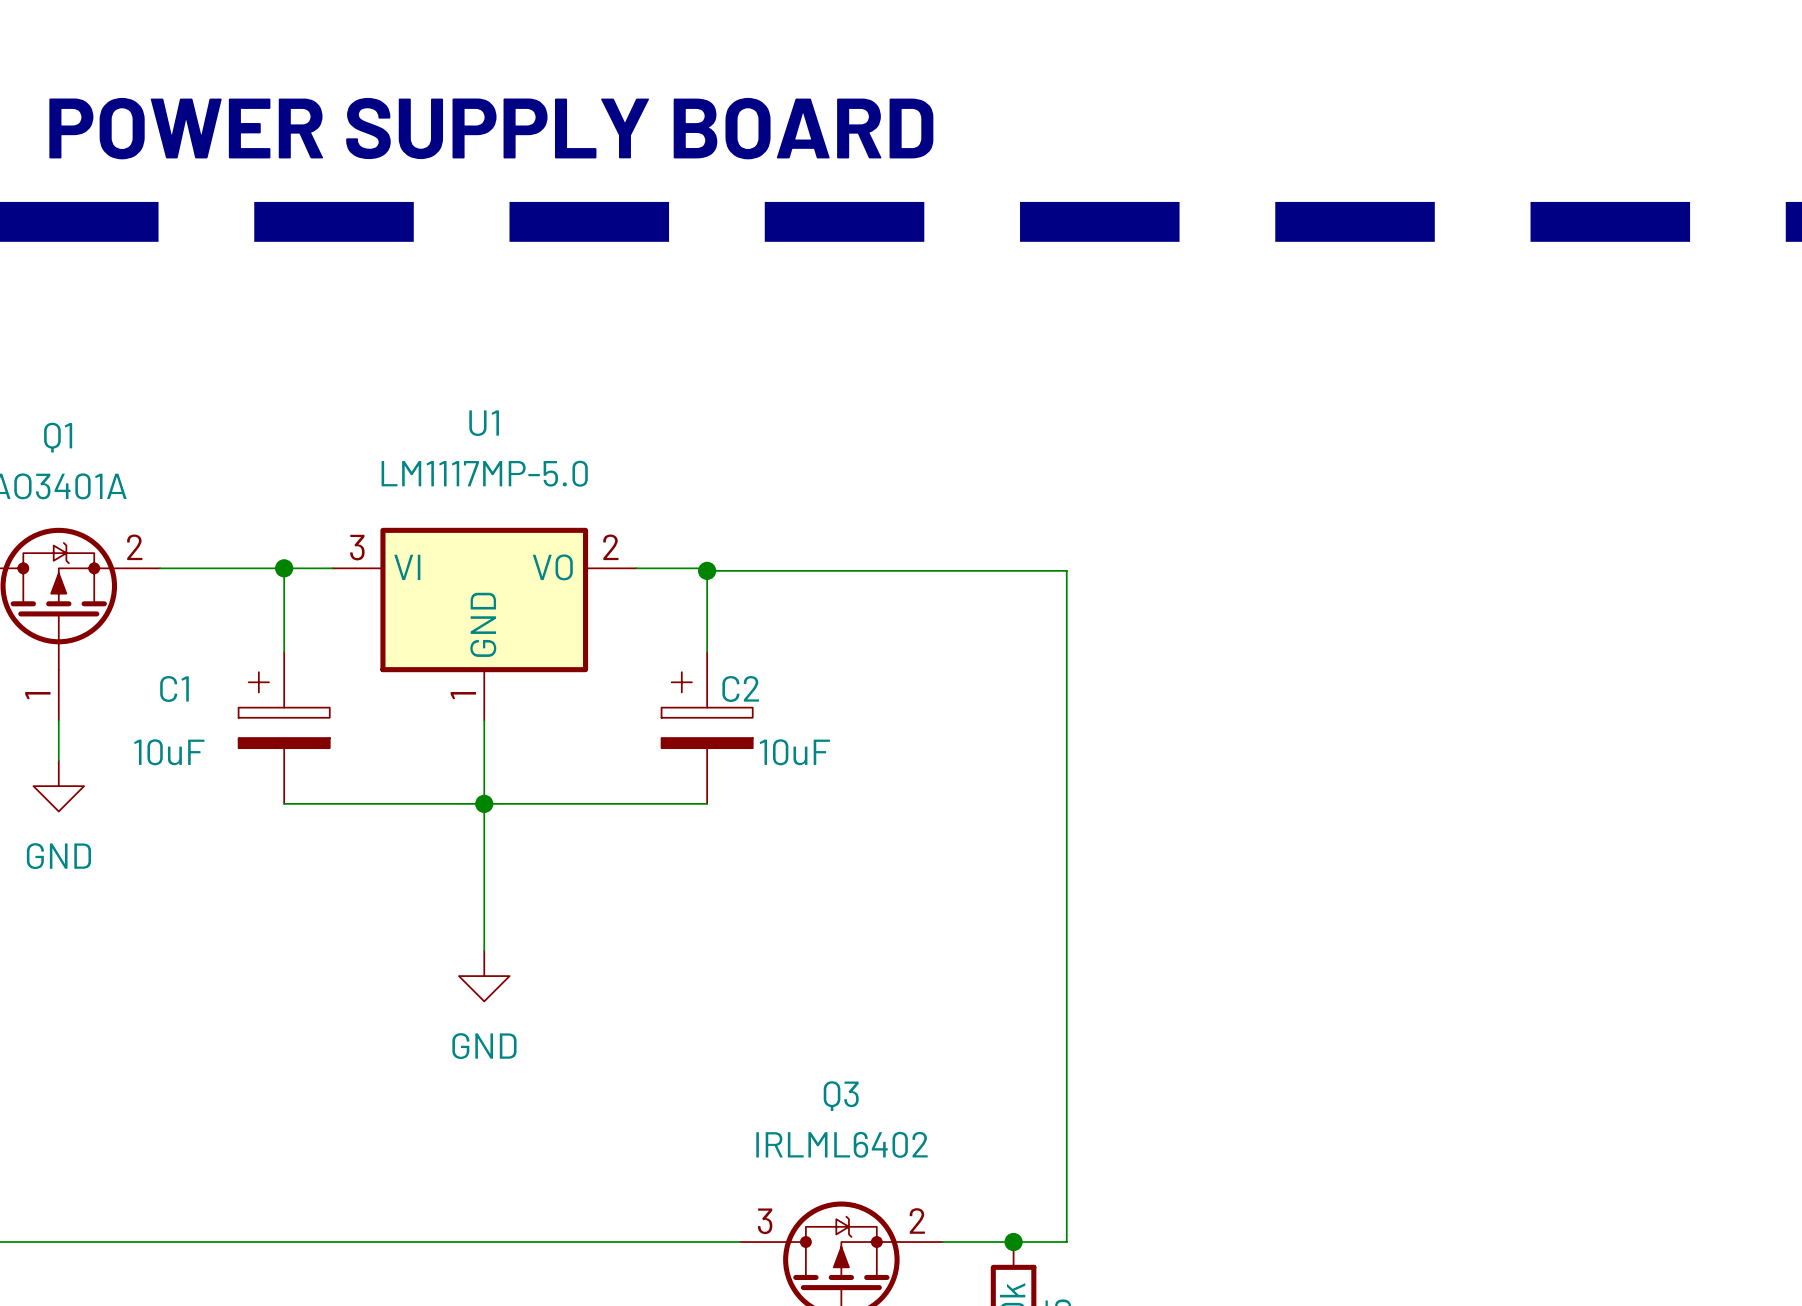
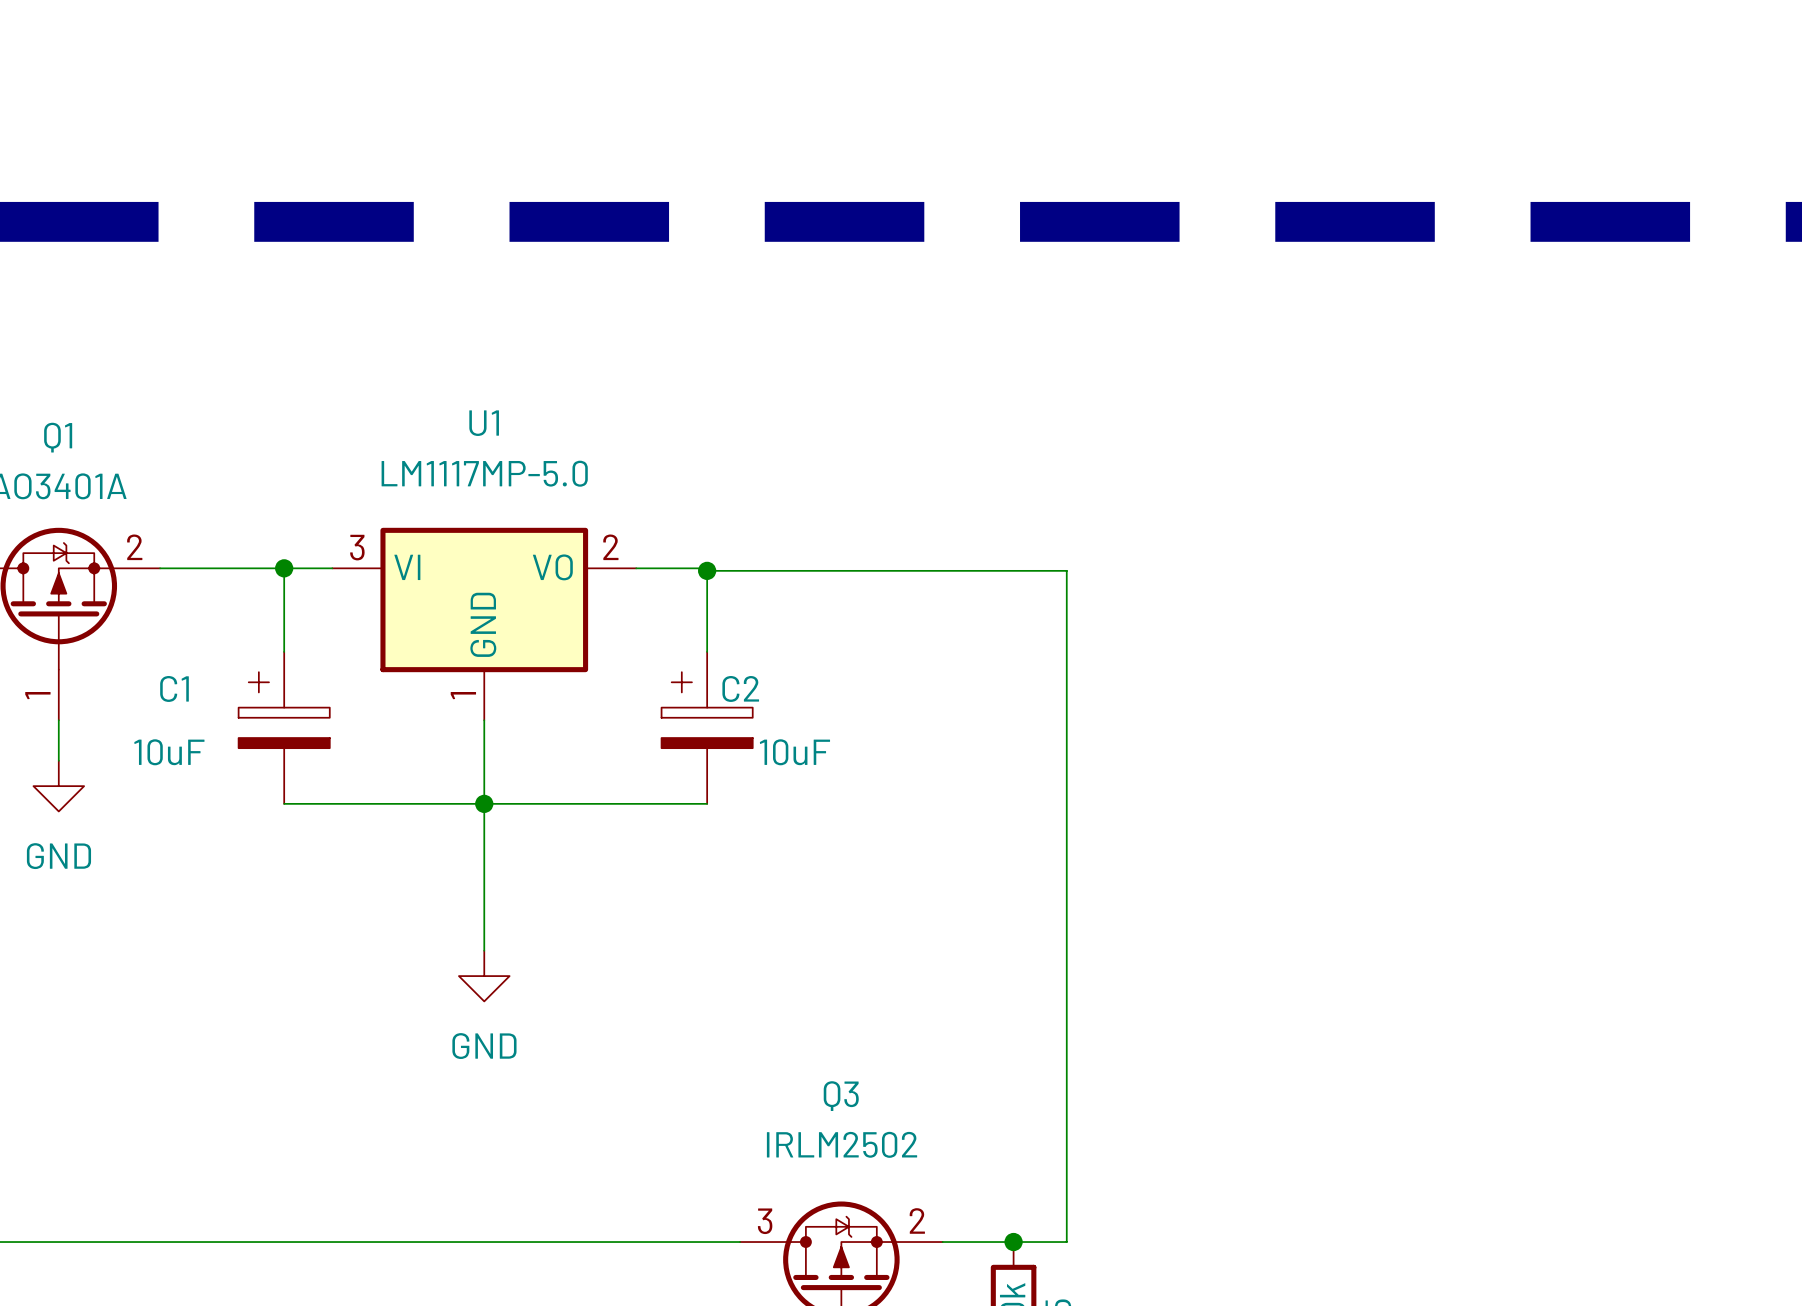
text: POWER SUPPLY BOARD (491, 128) -> none
Q3 value: IRLML6402 (842, 1144) -> IRLM2502 (842, 1144)

